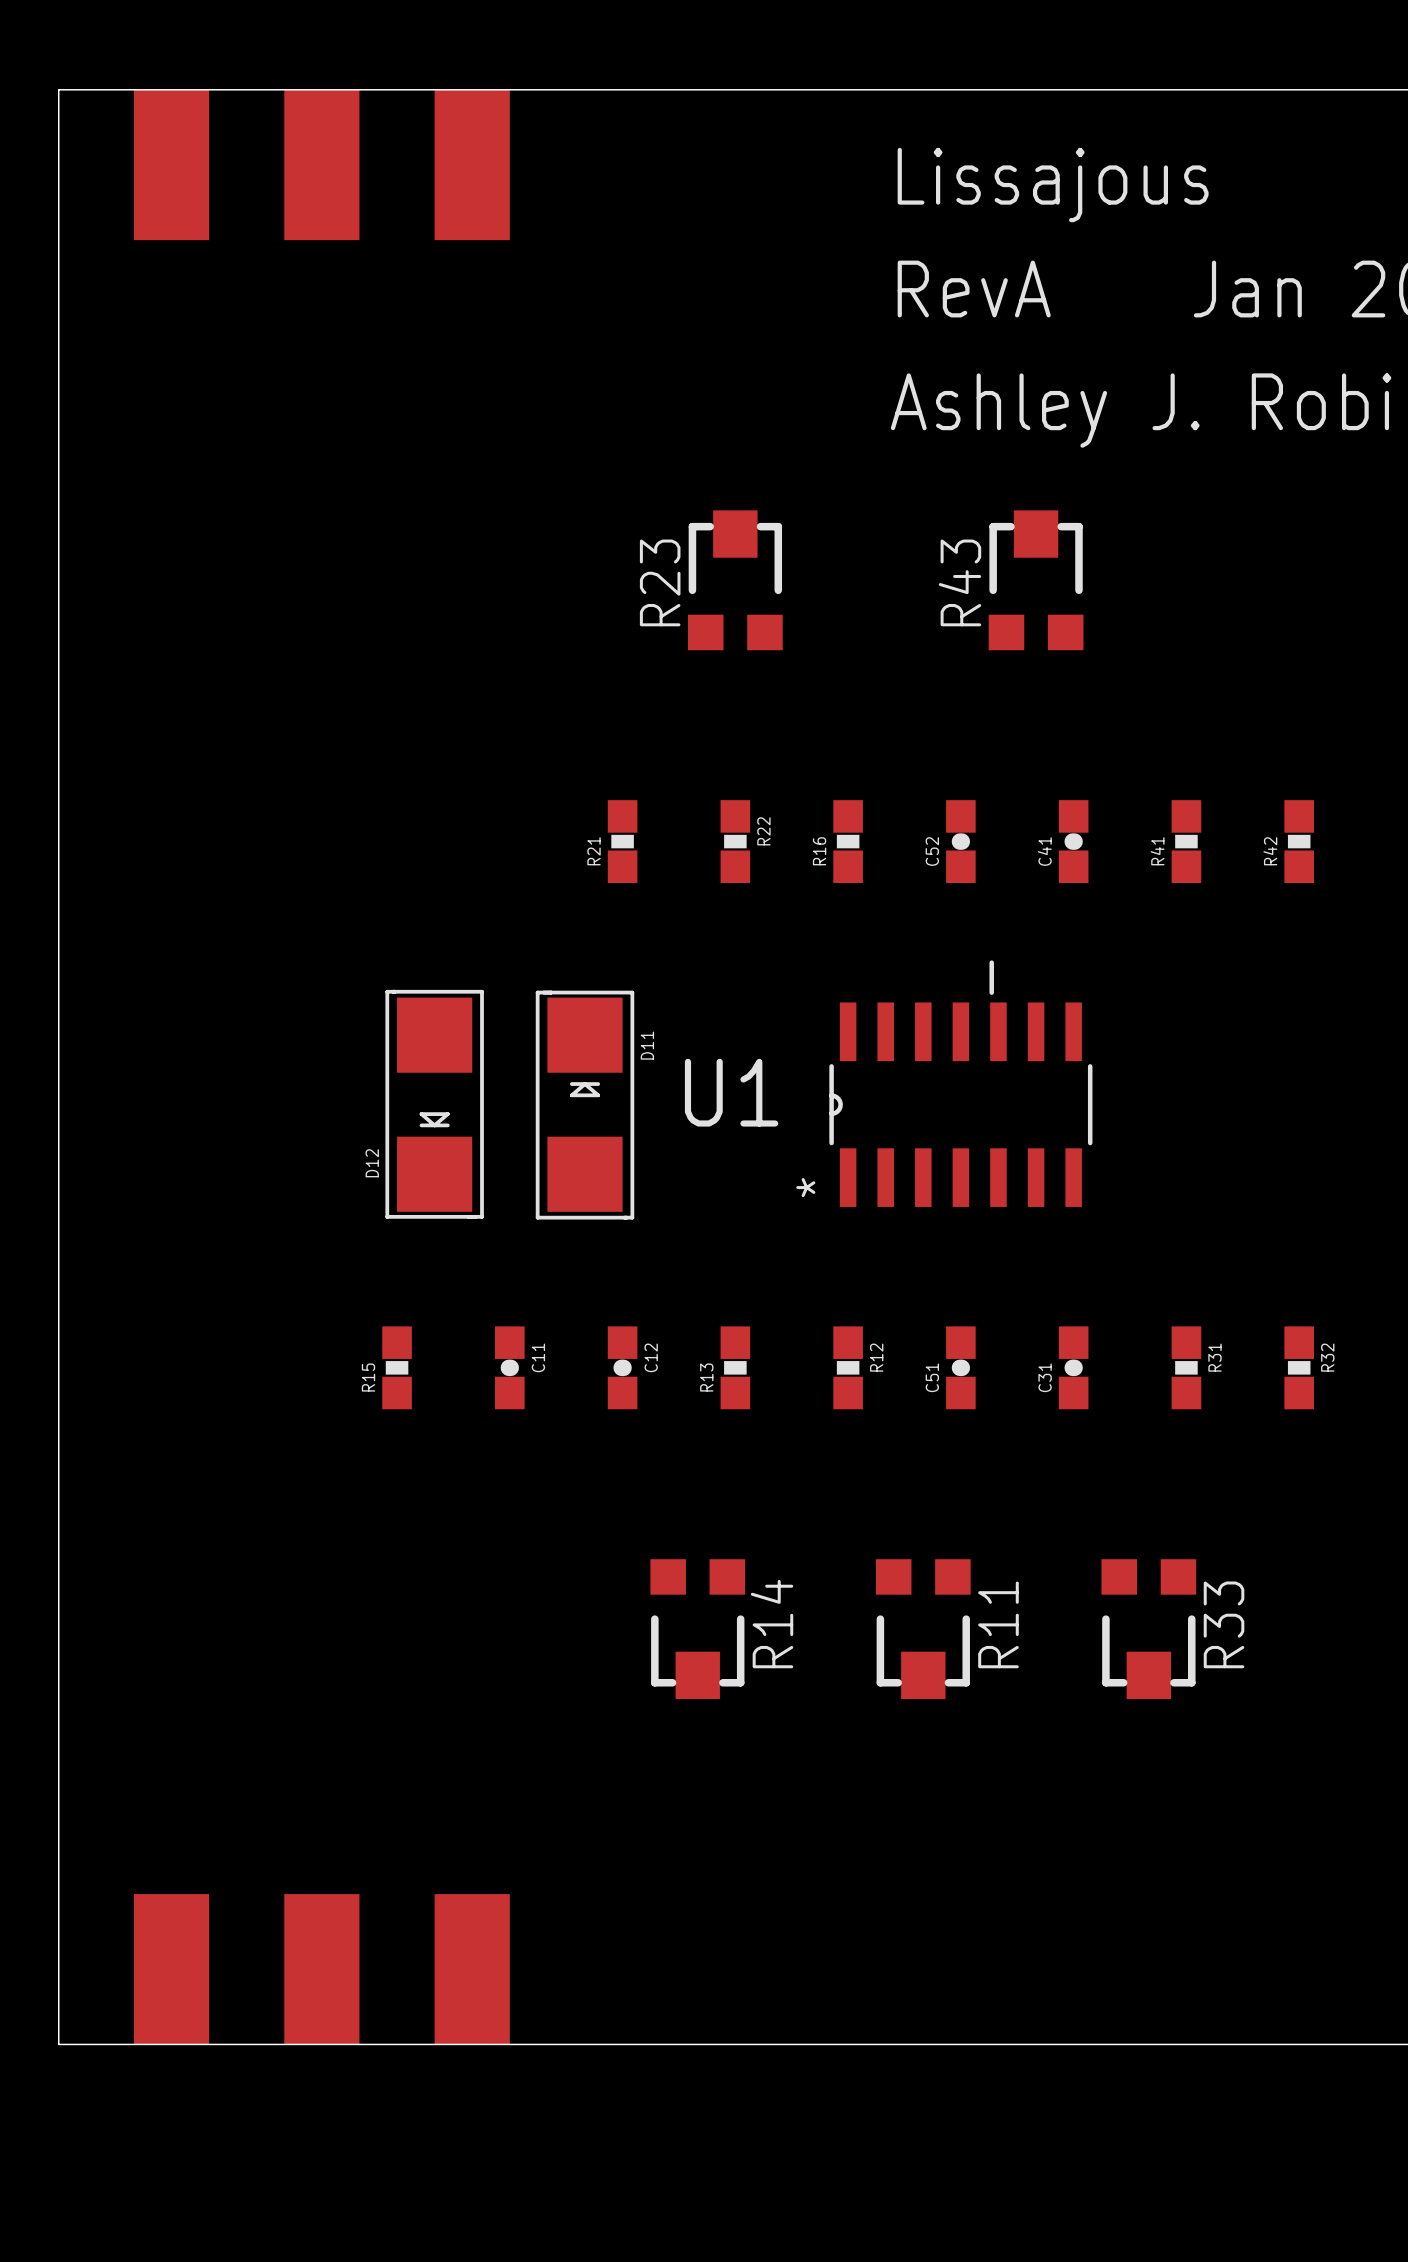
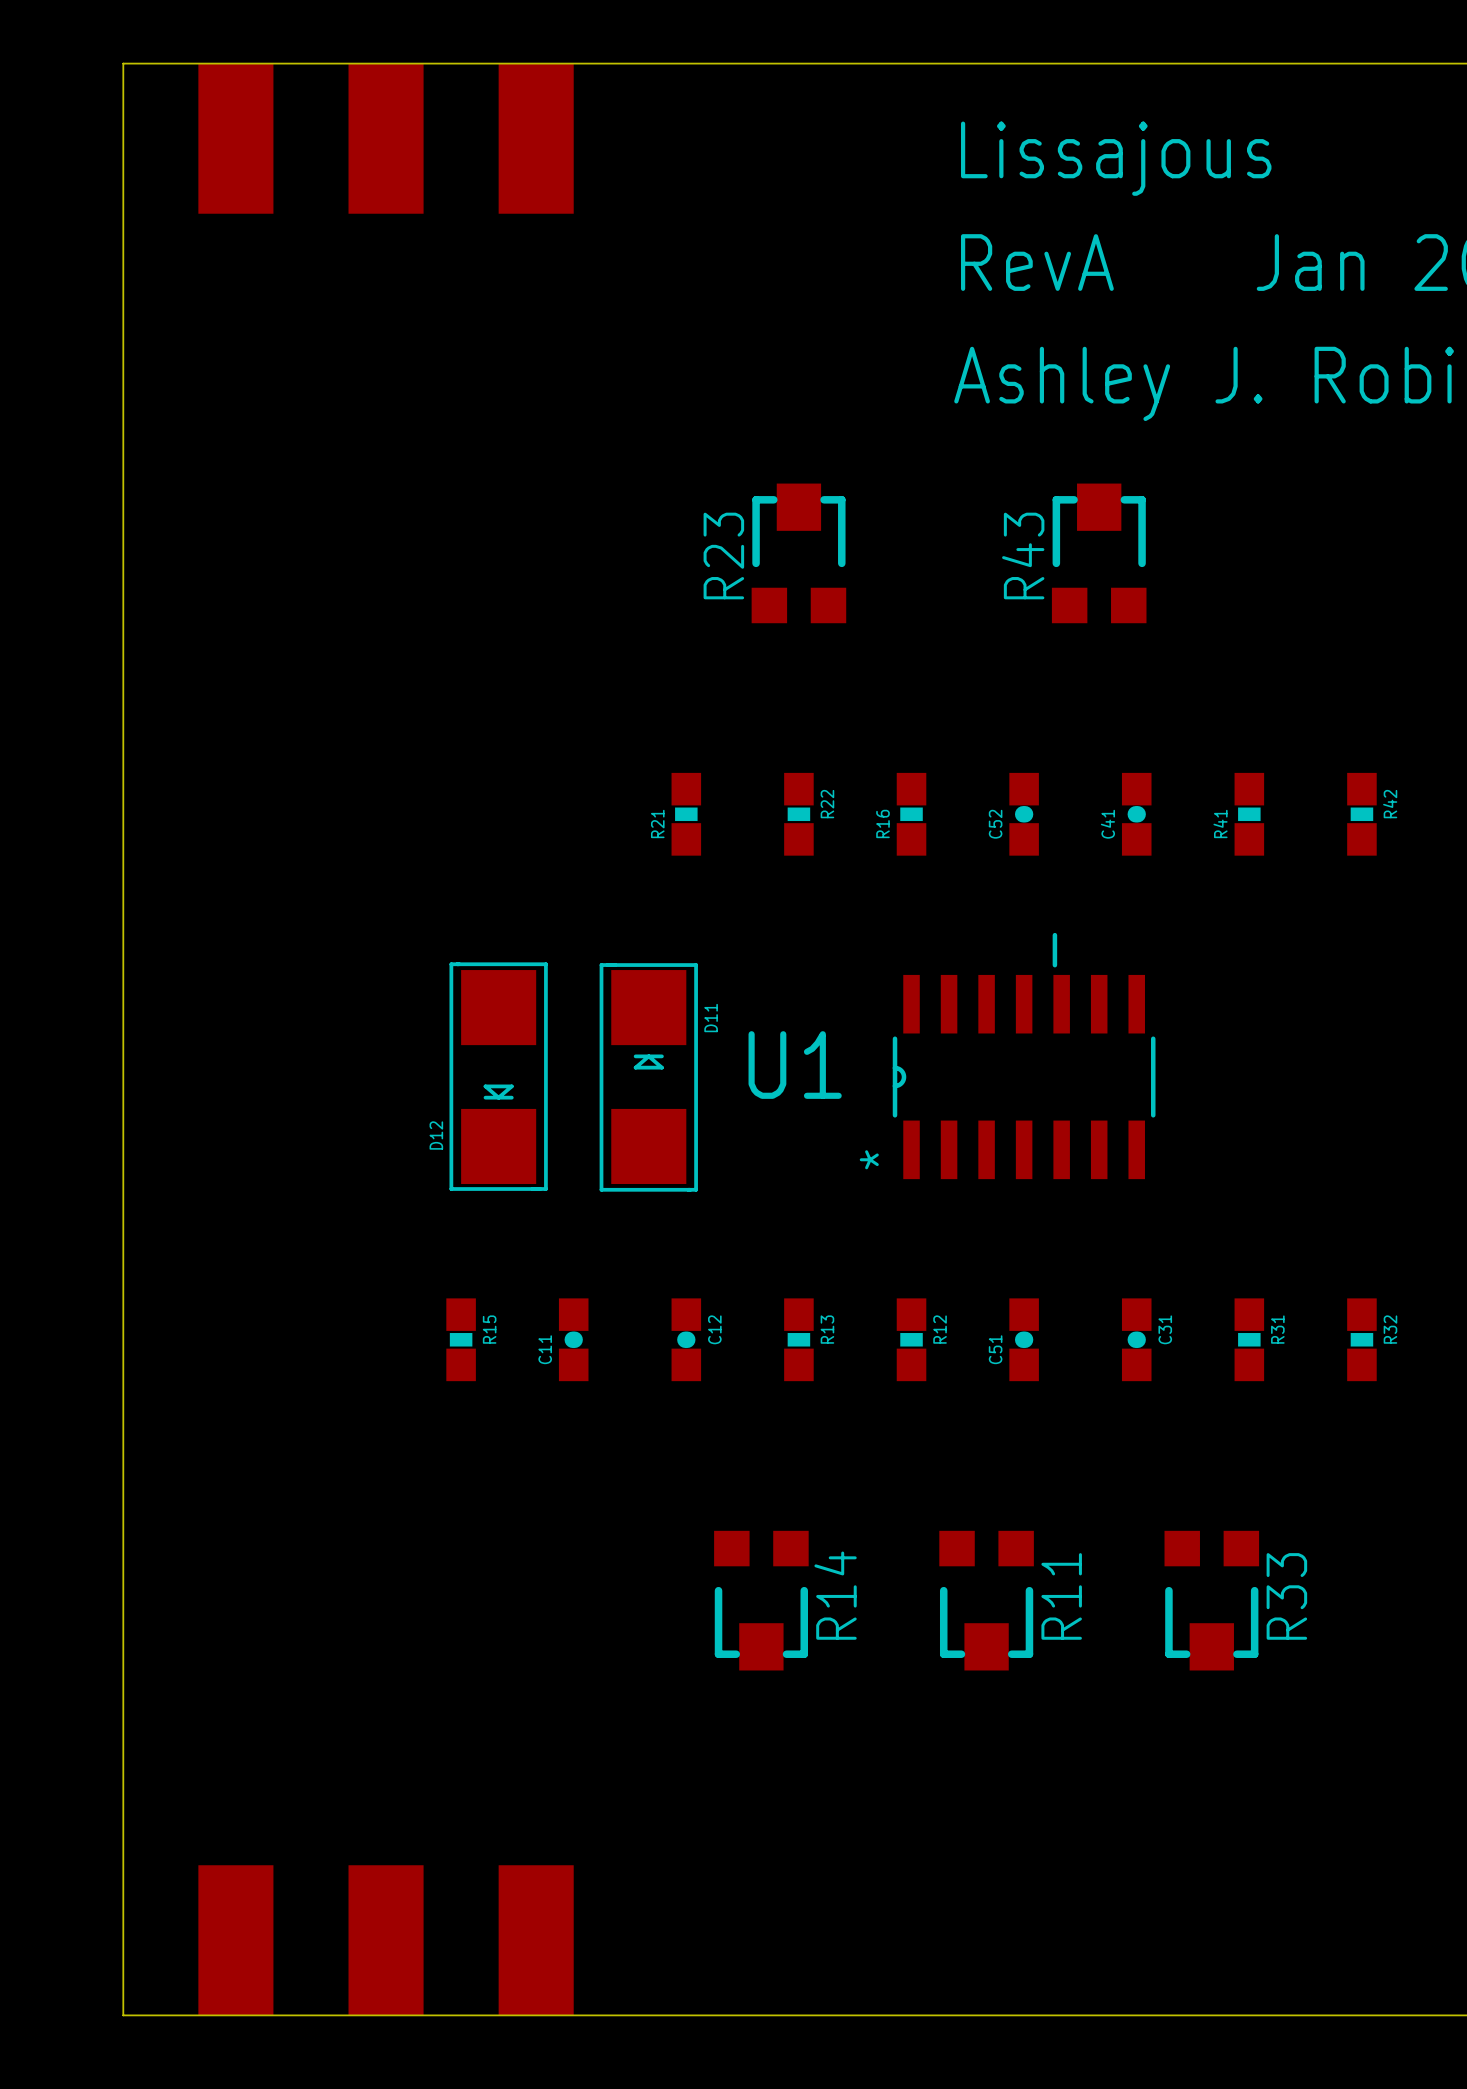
R42 name position: R42 (1270, 851) -> R42 (1390, 804)
C11 name position: C11 (538, 1357) -> C11 (545, 1349)
R15 name position: R15 (368, 1377) -> R15 (489, 1329)
R13 name position: R13 (706, 1377) -> R13 (827, 1329)
C31 name position: C31 (1045, 1377) -> C31 (1165, 1329)

